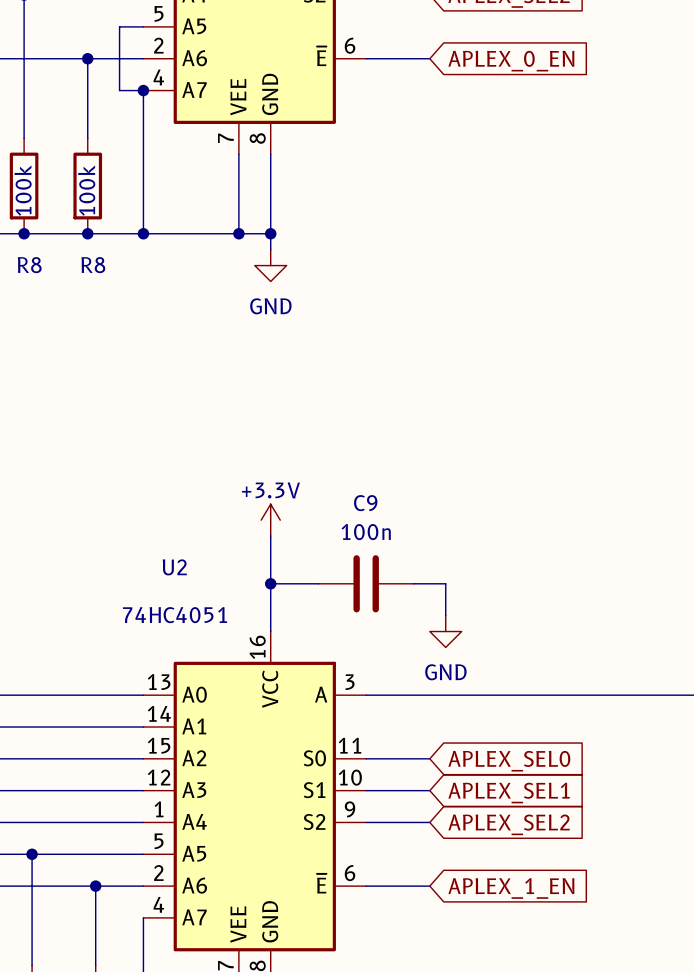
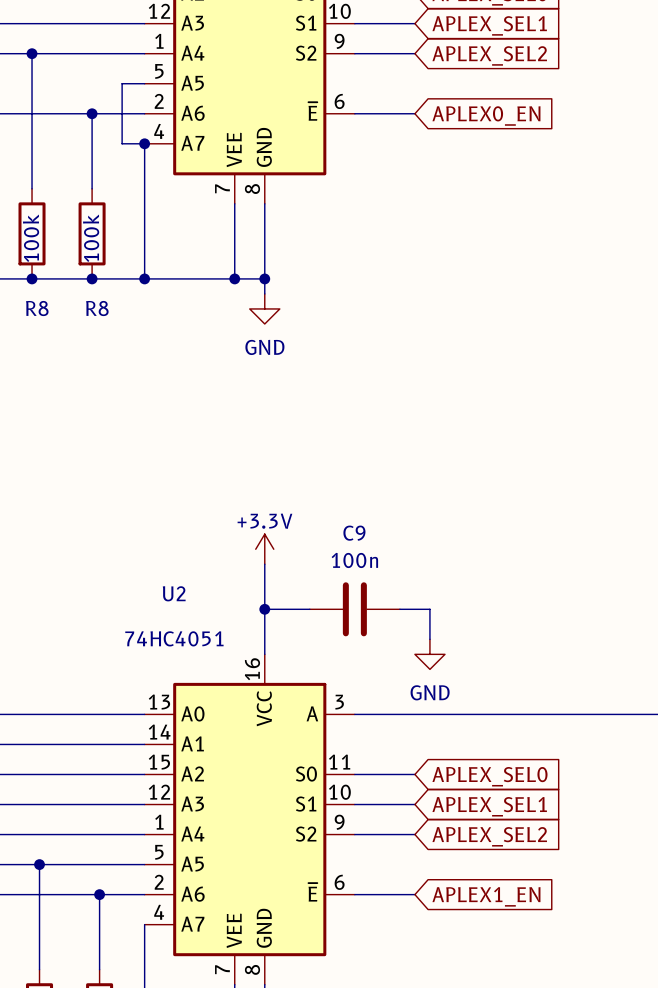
global label: APLEX_0_EN (511, 61) -> APLEX0_EN (486, 116)
global label: APLEX_1_EN (511, 888) -> APLEX1_EN (486, 896)

